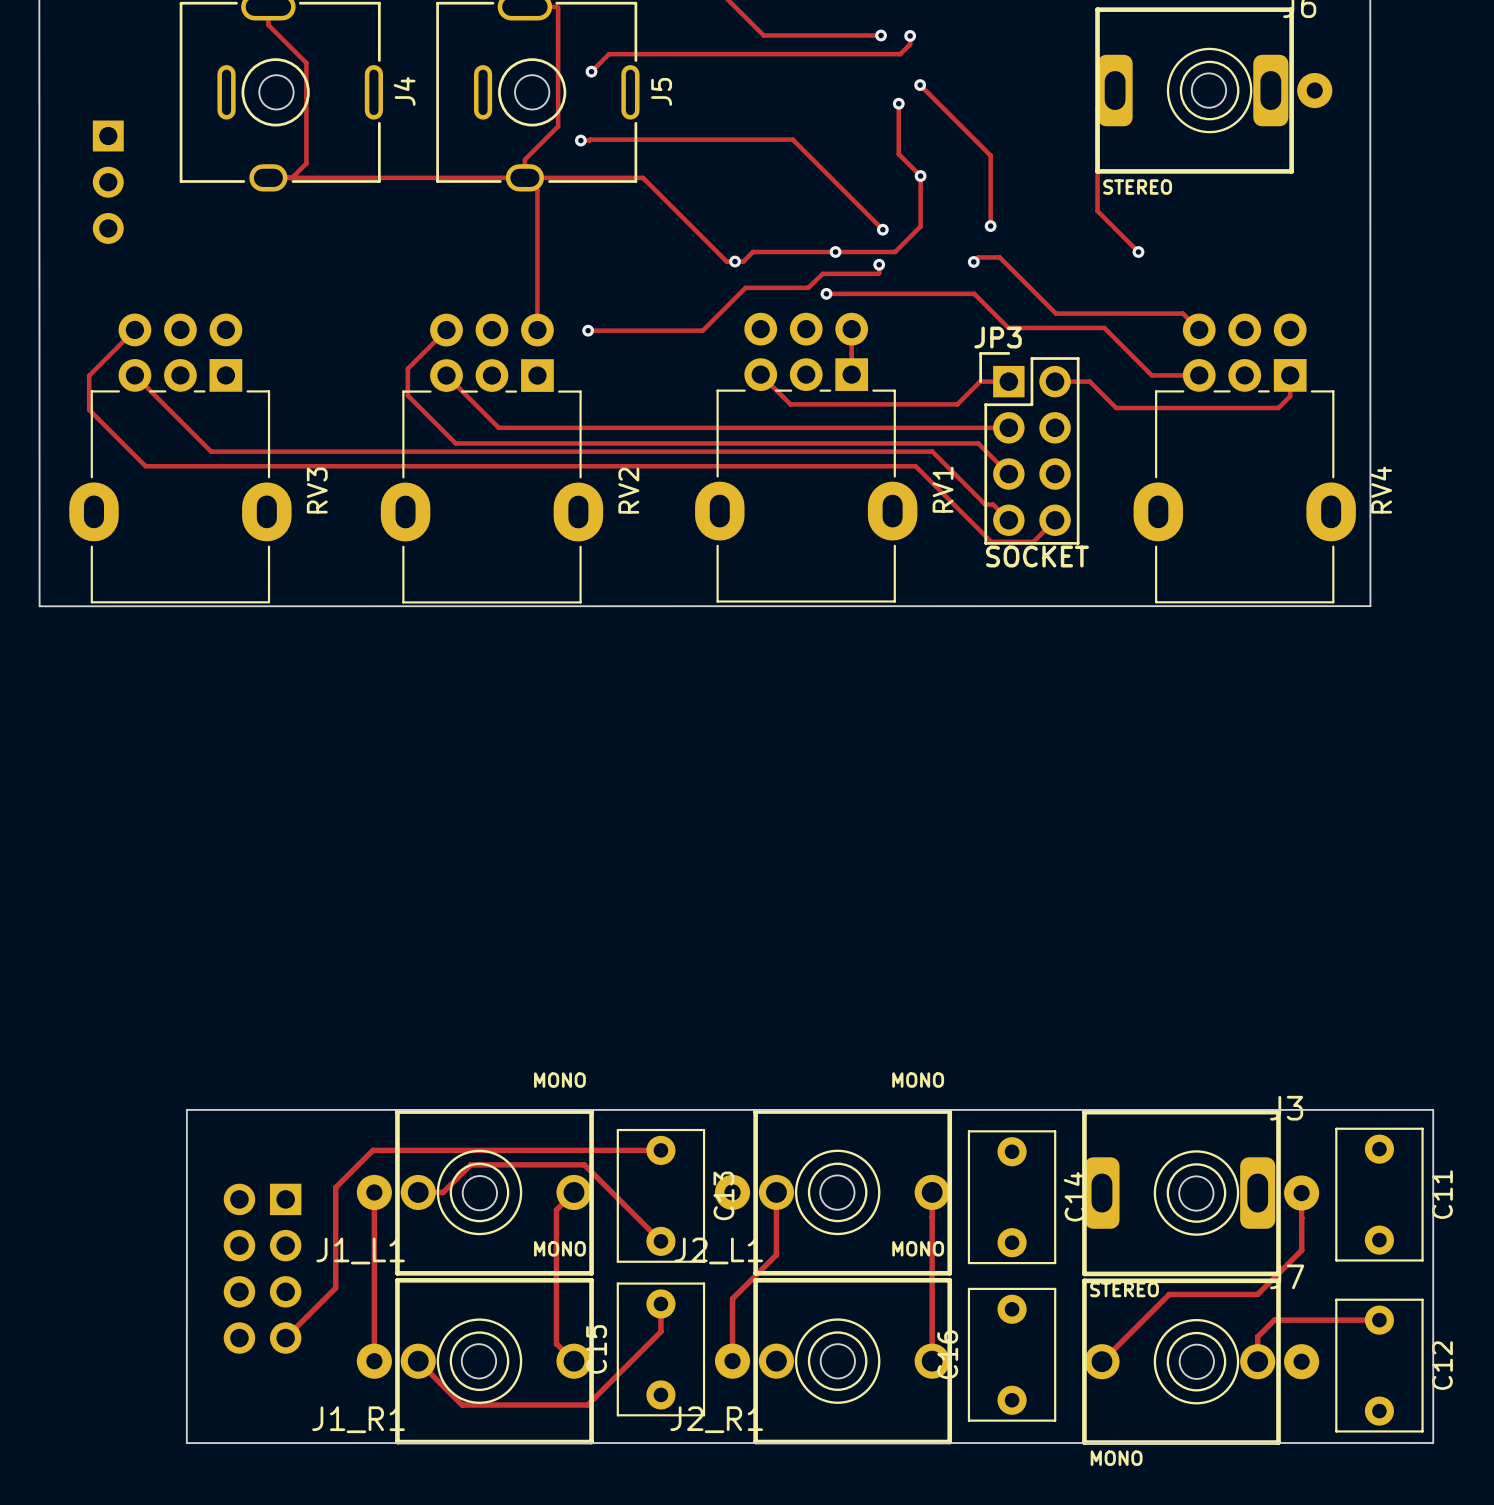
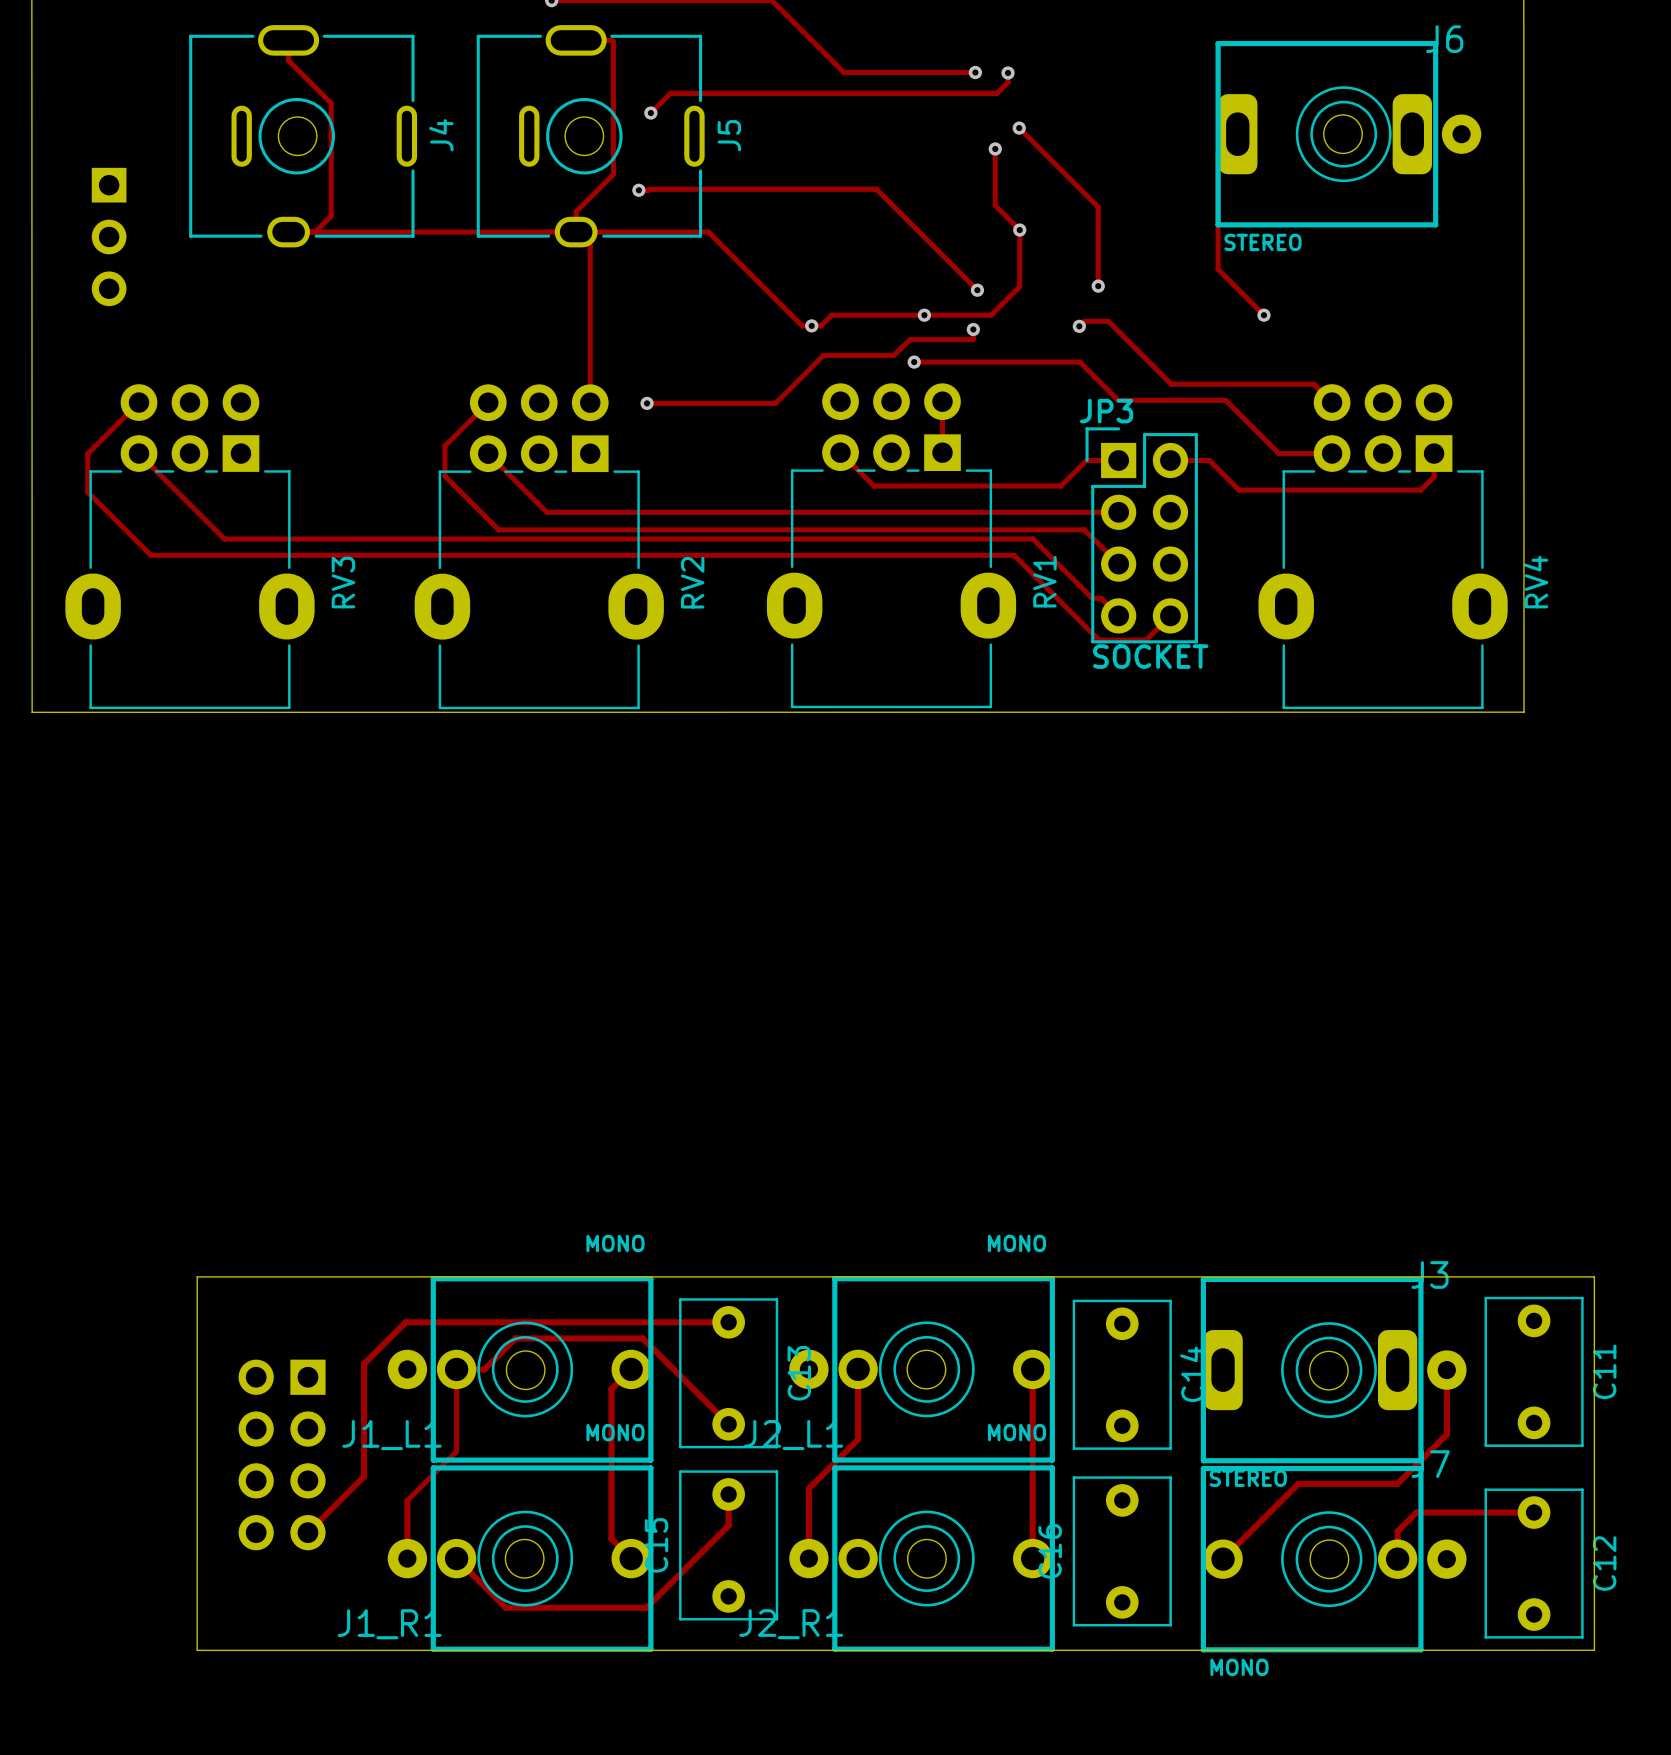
track: (374, 1192) (374, 1309) -> (456, 1369) (456, 1451) (407, 1500)

